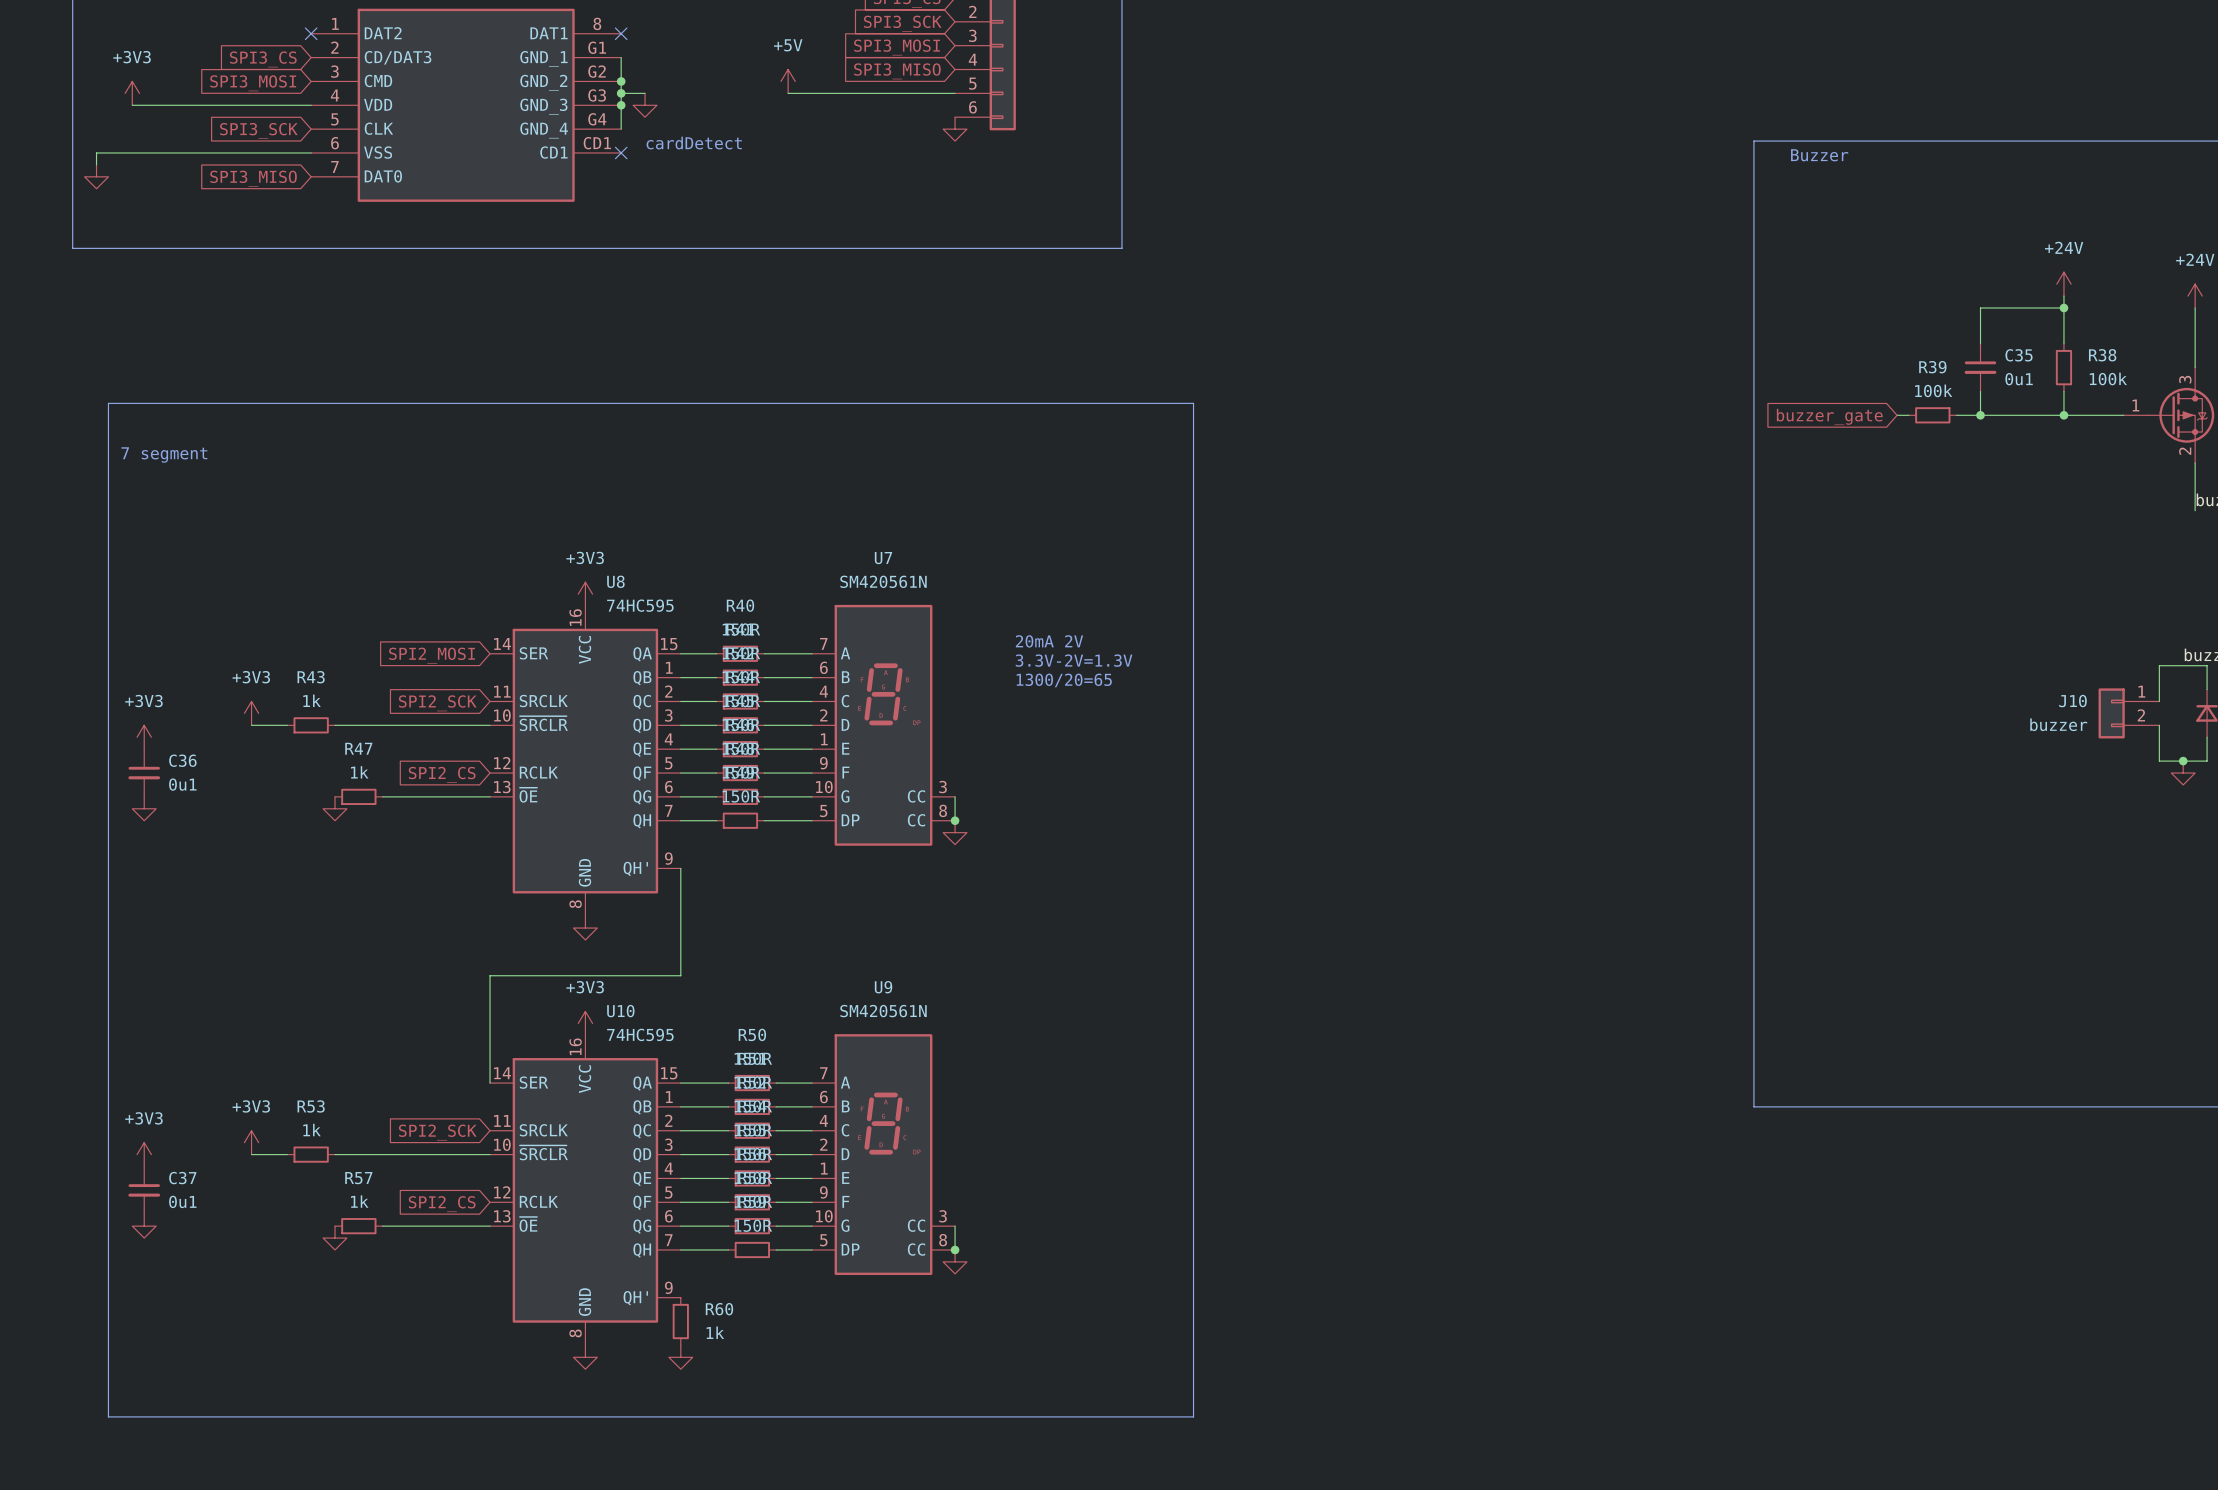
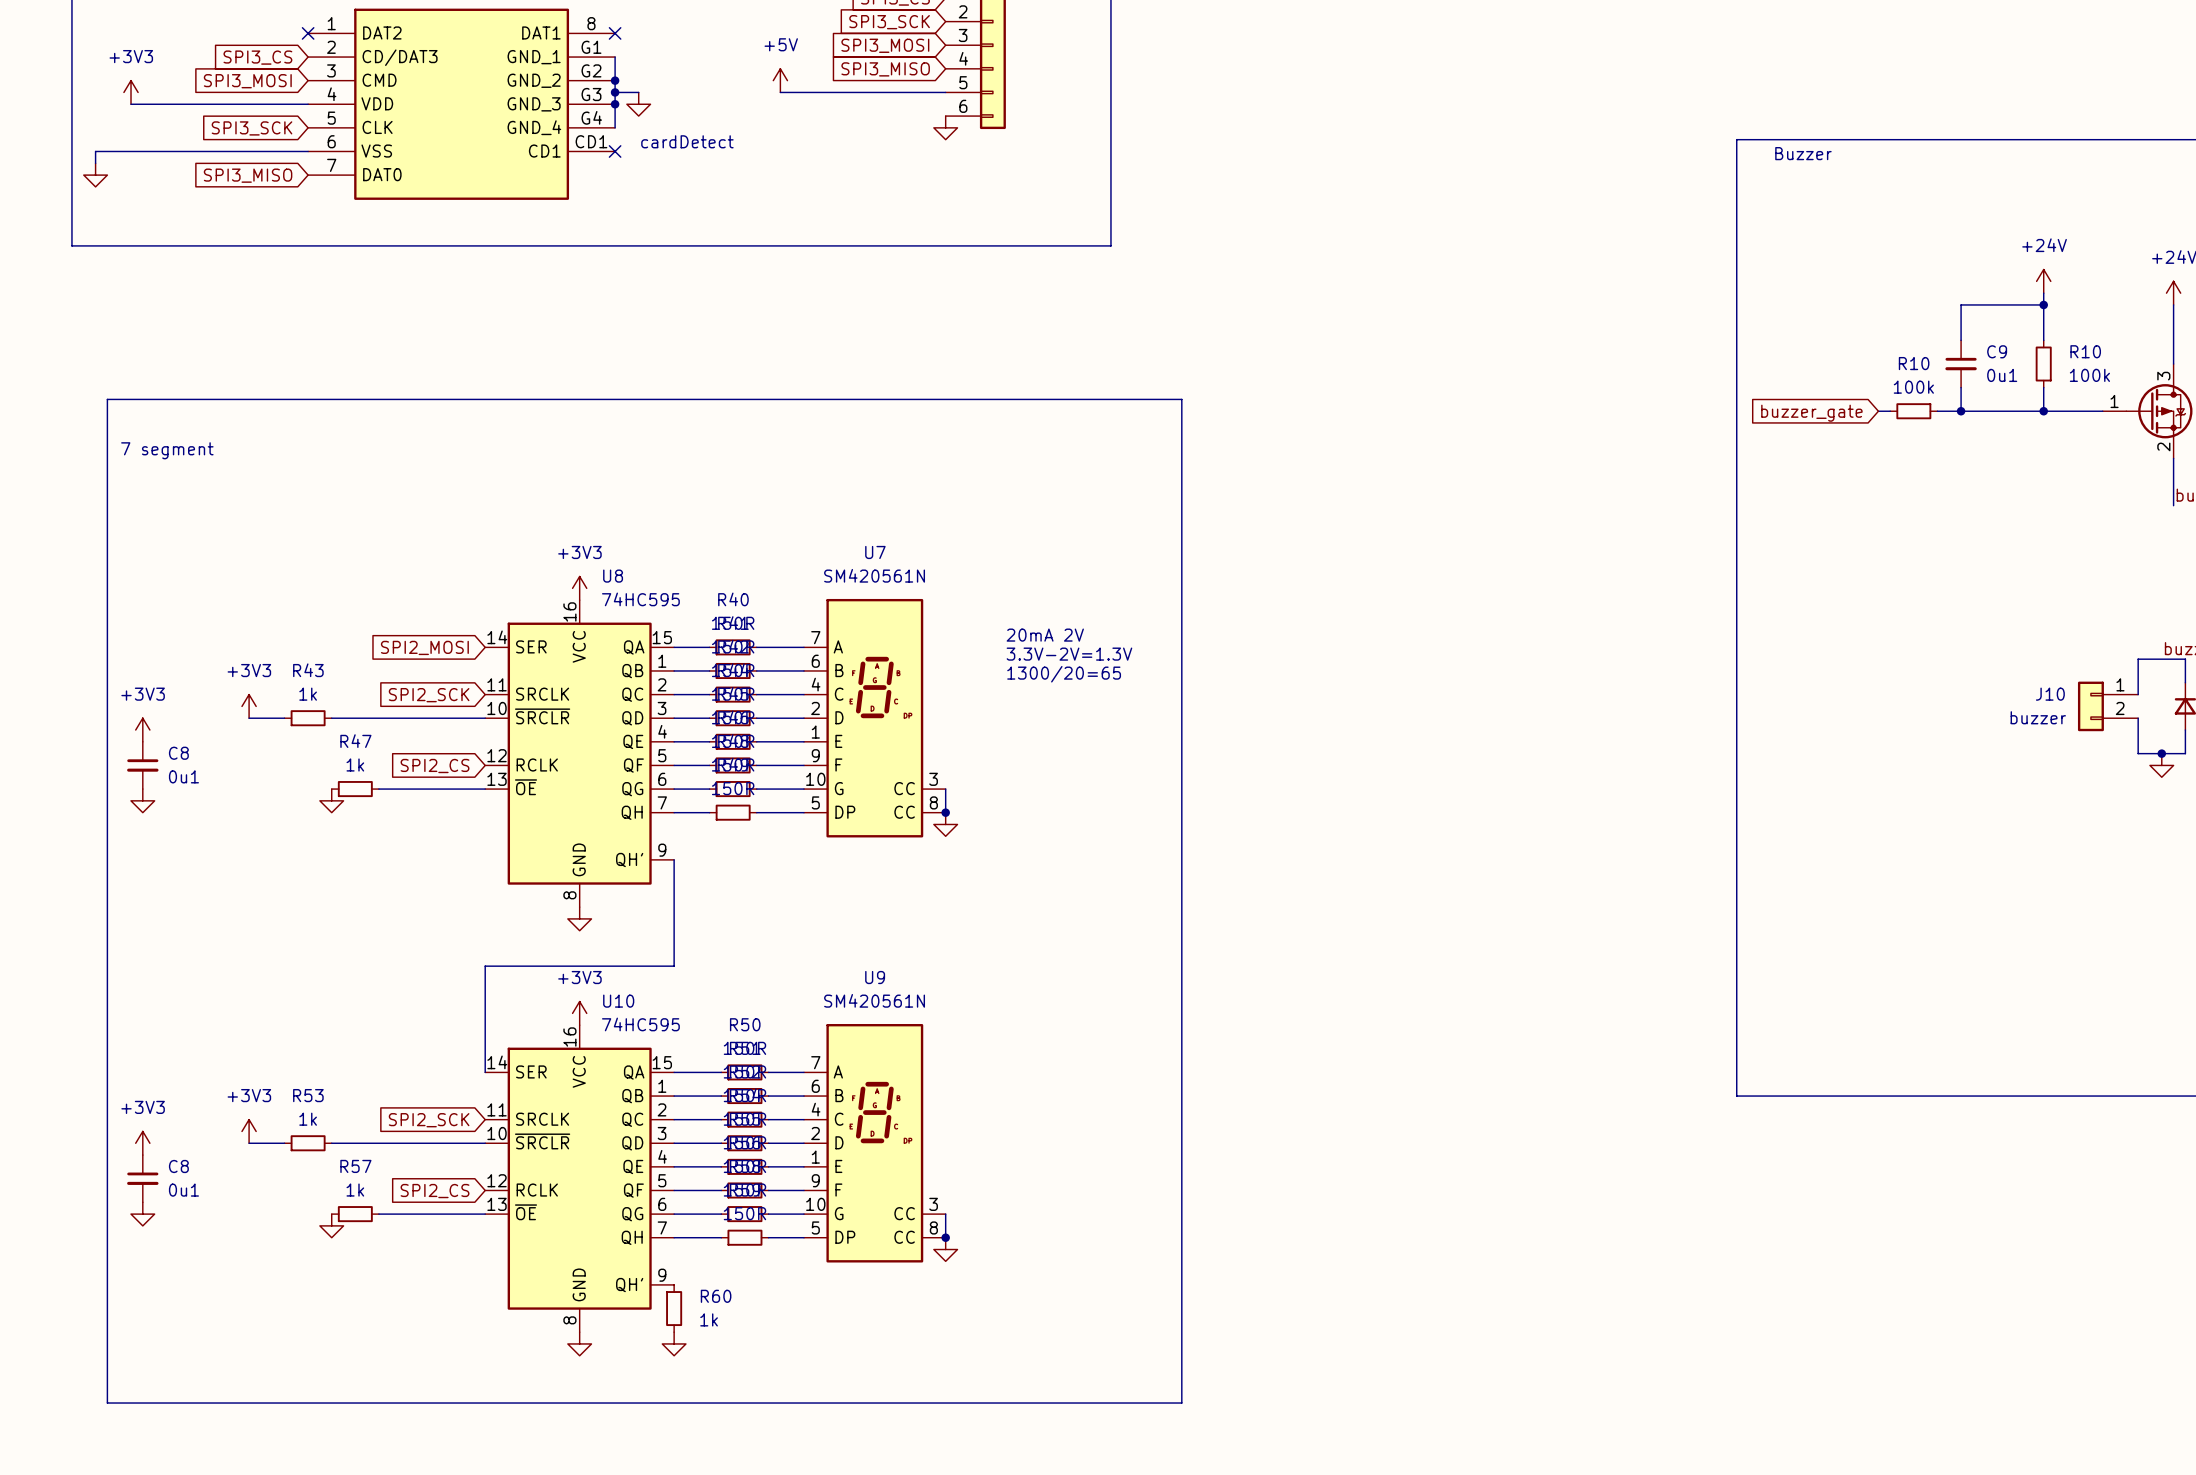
C35 name: C35 (2019, 355) -> C9 (1997, 351)
R38 name: R38 (2102, 355) -> R10 (2085, 351)
R39 name: R39 (1932, 367) -> R10 (1914, 363)
C36 name: C36 (182, 760) -> C8 (178, 753)
C37 name: C37 (182, 1178) -> C8 (178, 1166)

